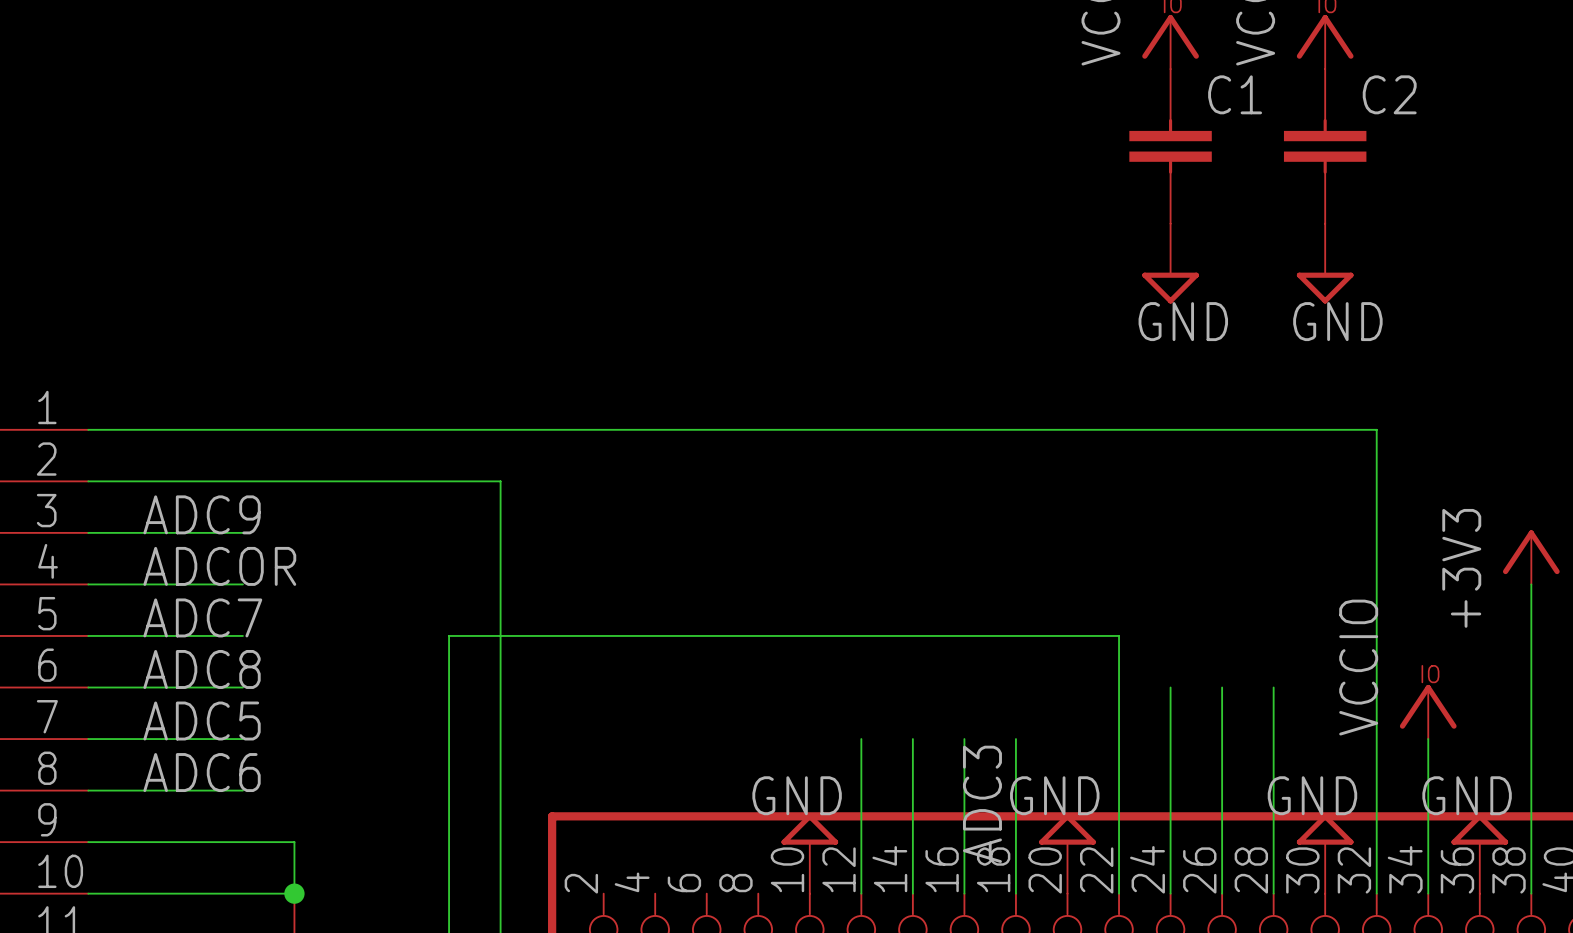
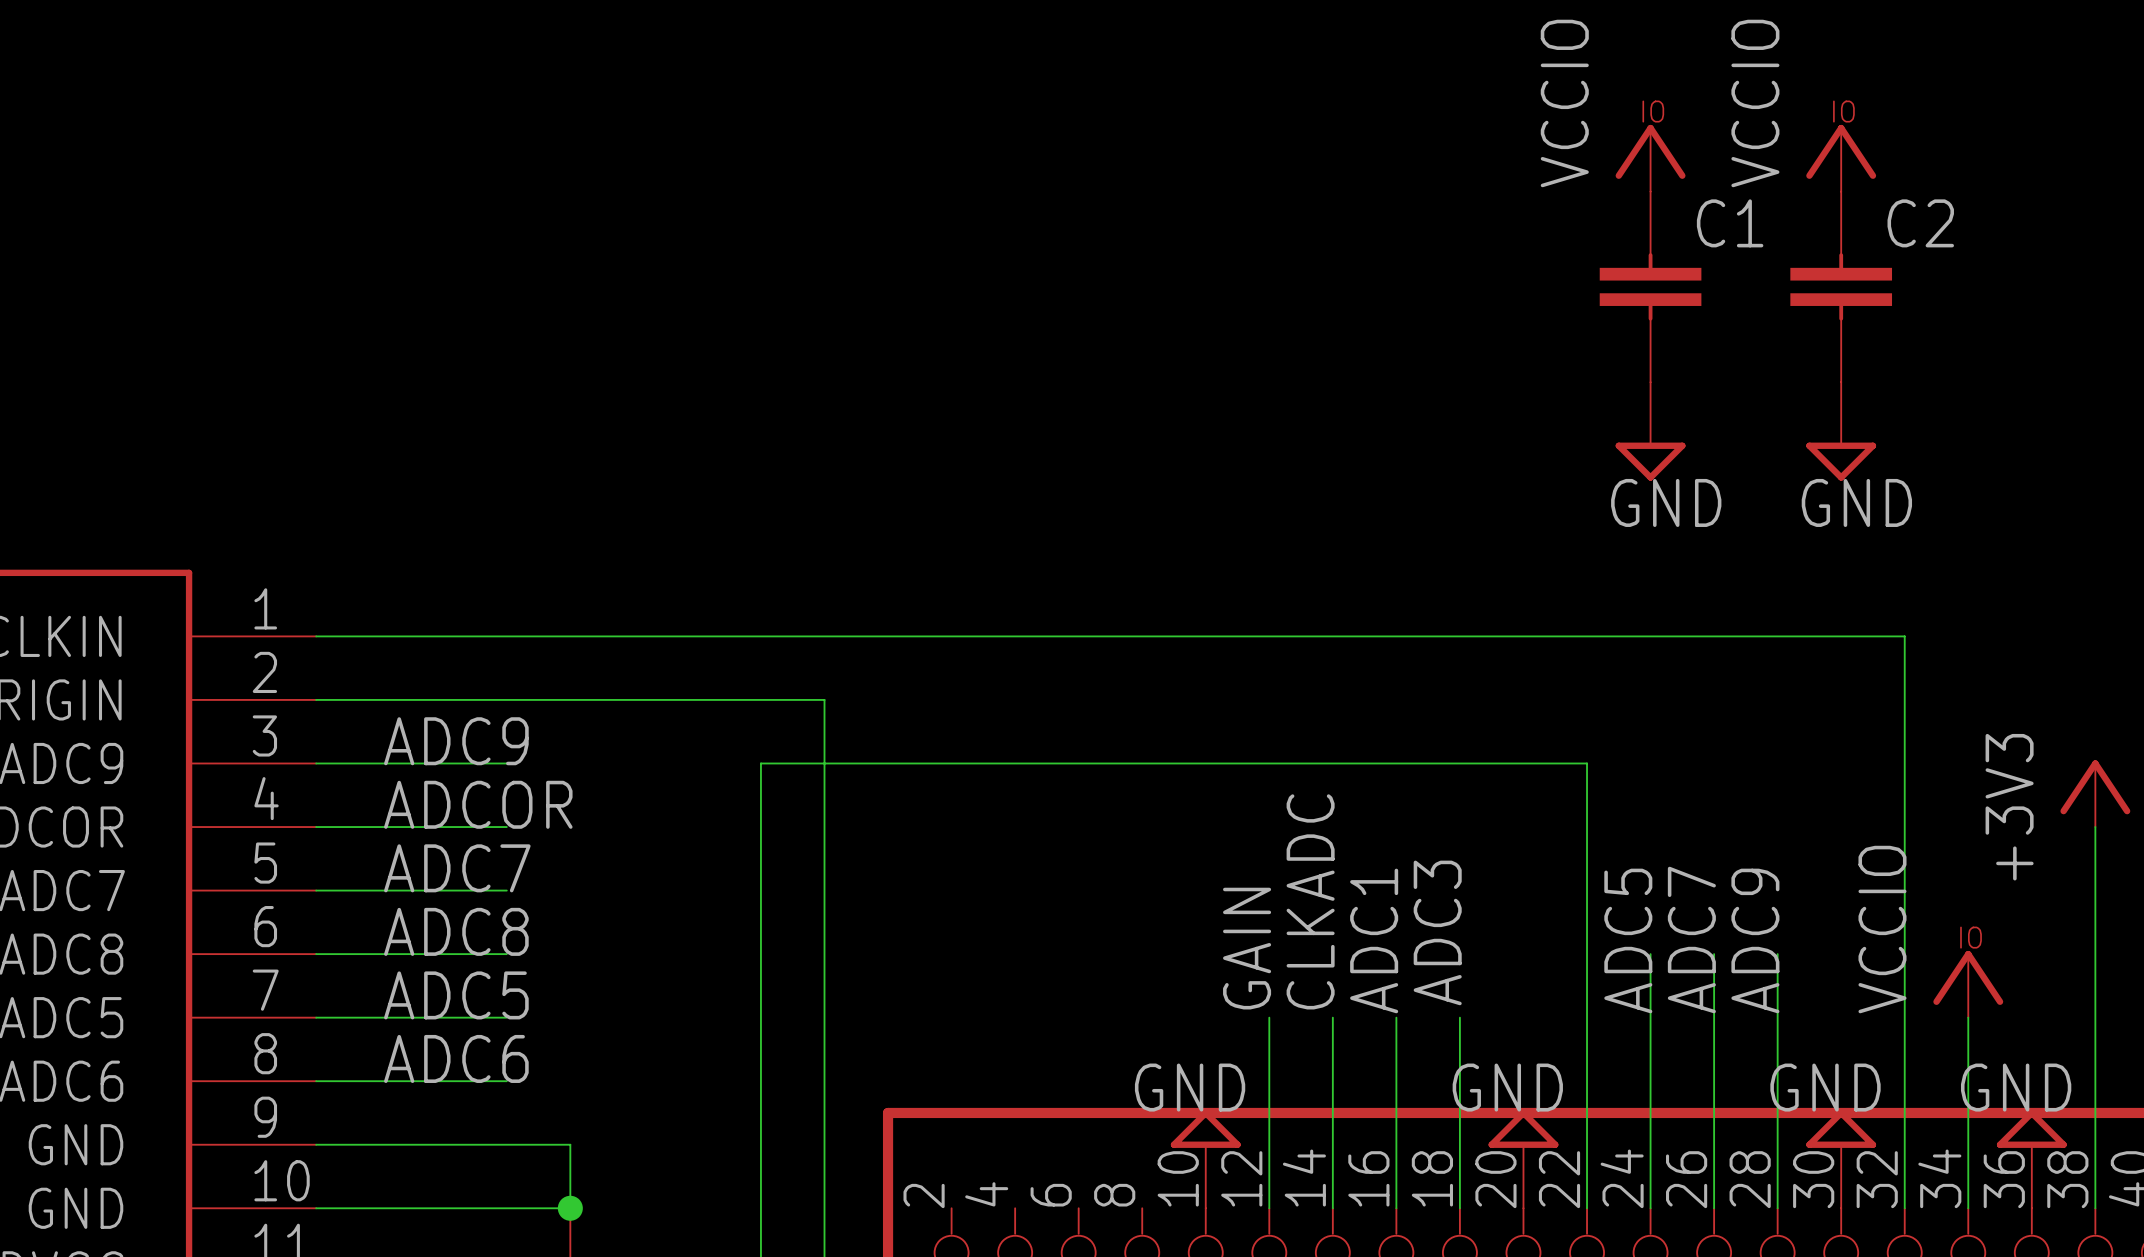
wire: (449, 635) (1119, 635) -> (760, 890) (760, 763) (1587, 763) (1587, 890)
label: none -> CLKADC (1310, 901)
label: none -> ADC3 (1437, 932)
label: none -> ADC5 (1628, 940)
label: none -> ADC7 (1691, 940)
label: none -> ADC9 (1755, 940)
label: none -> GAIN (1247, 948)
label: ADC3 (982, 804) -> ADC1 (1374, 940)

